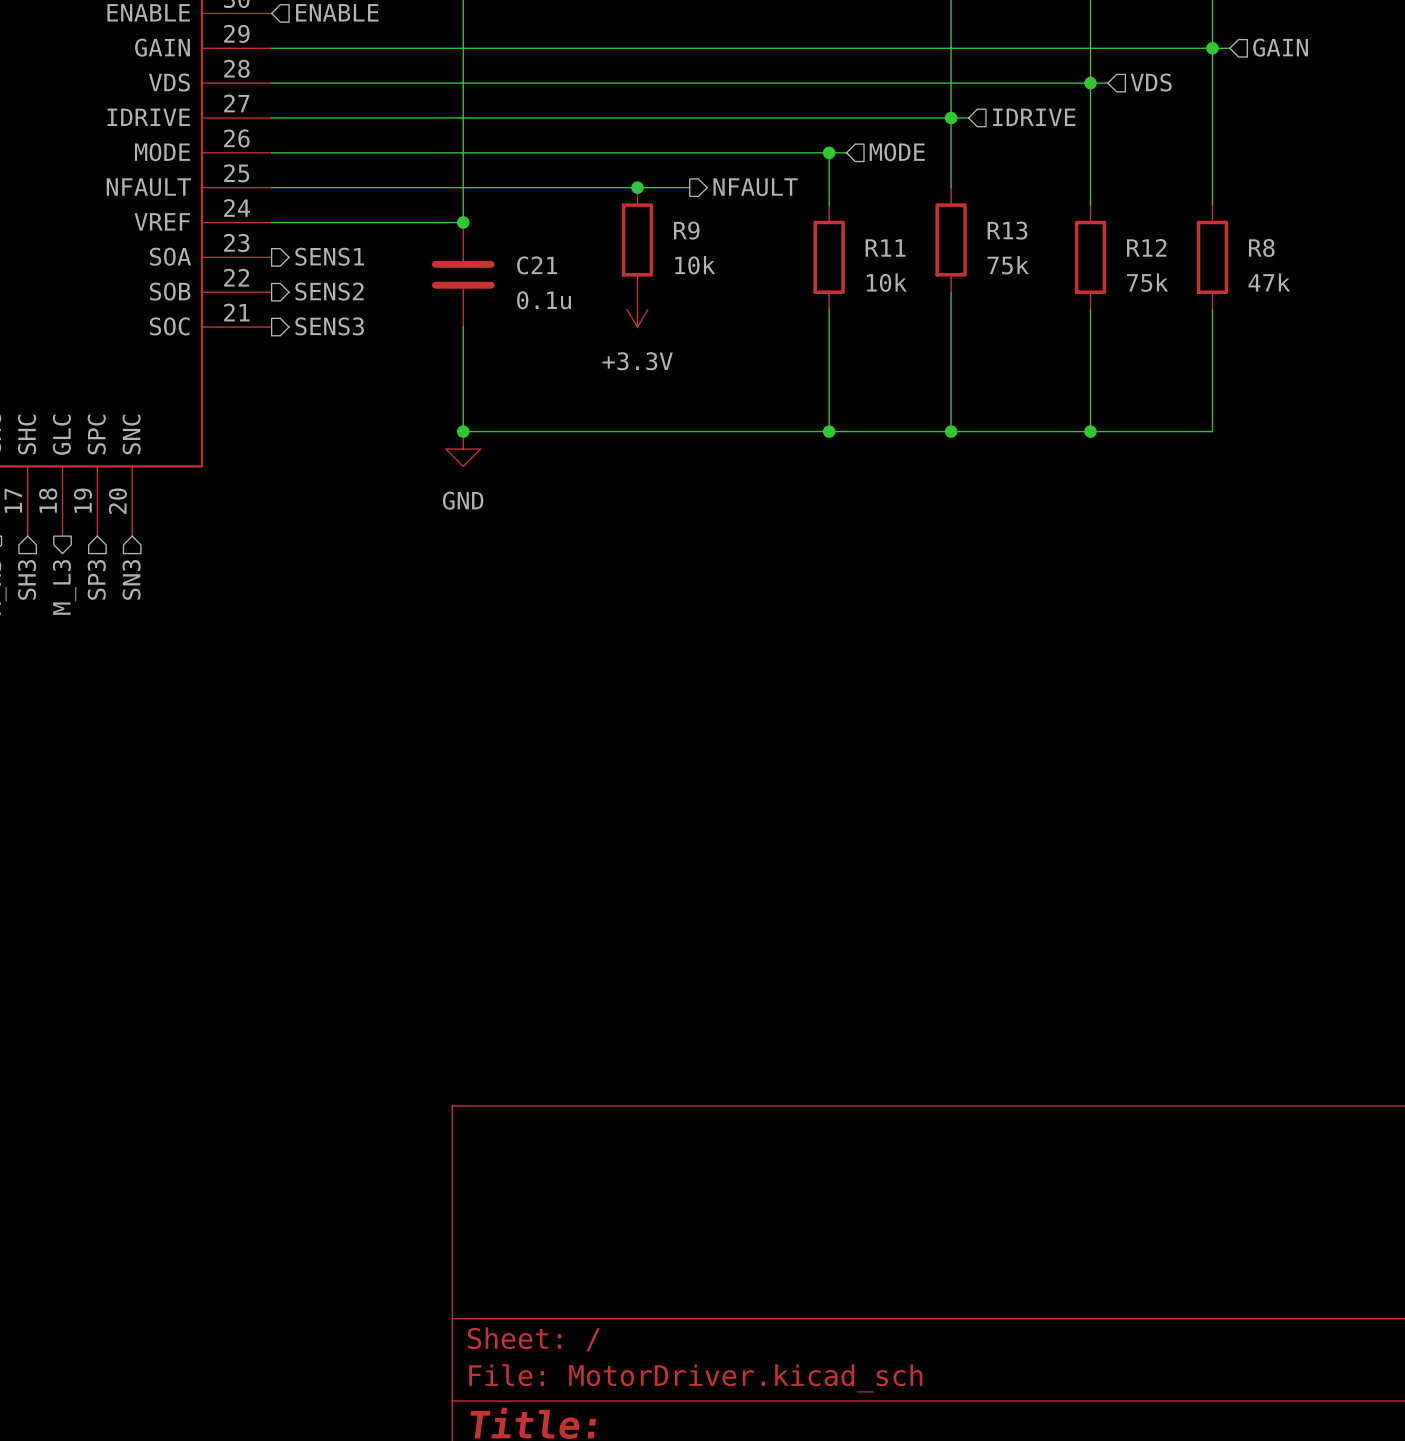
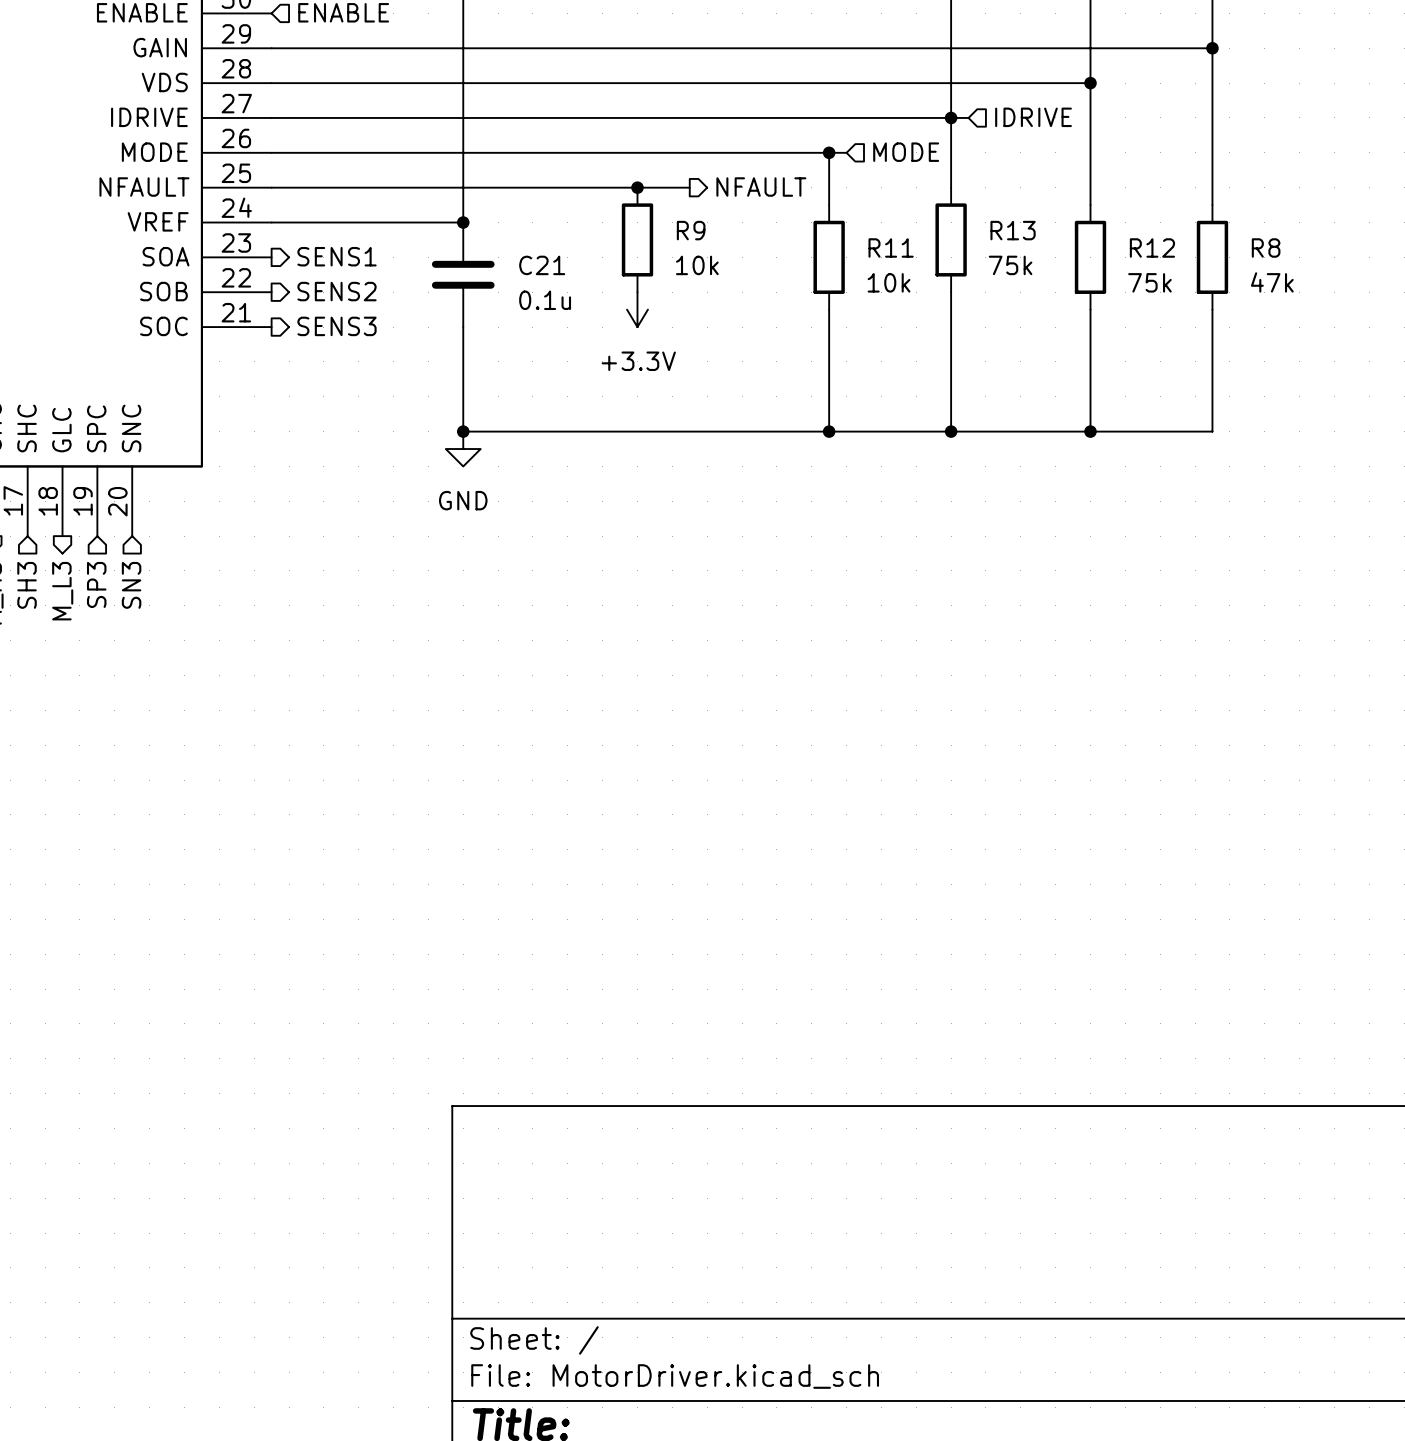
hierarchical label: GAIN (1280, 47) -> none
wire: (1212, 48) (1229, 48) -> none
hierarchical label: VDS (1151, 82) -> none
wire: (1090, 83) (1107, 83) -> none

